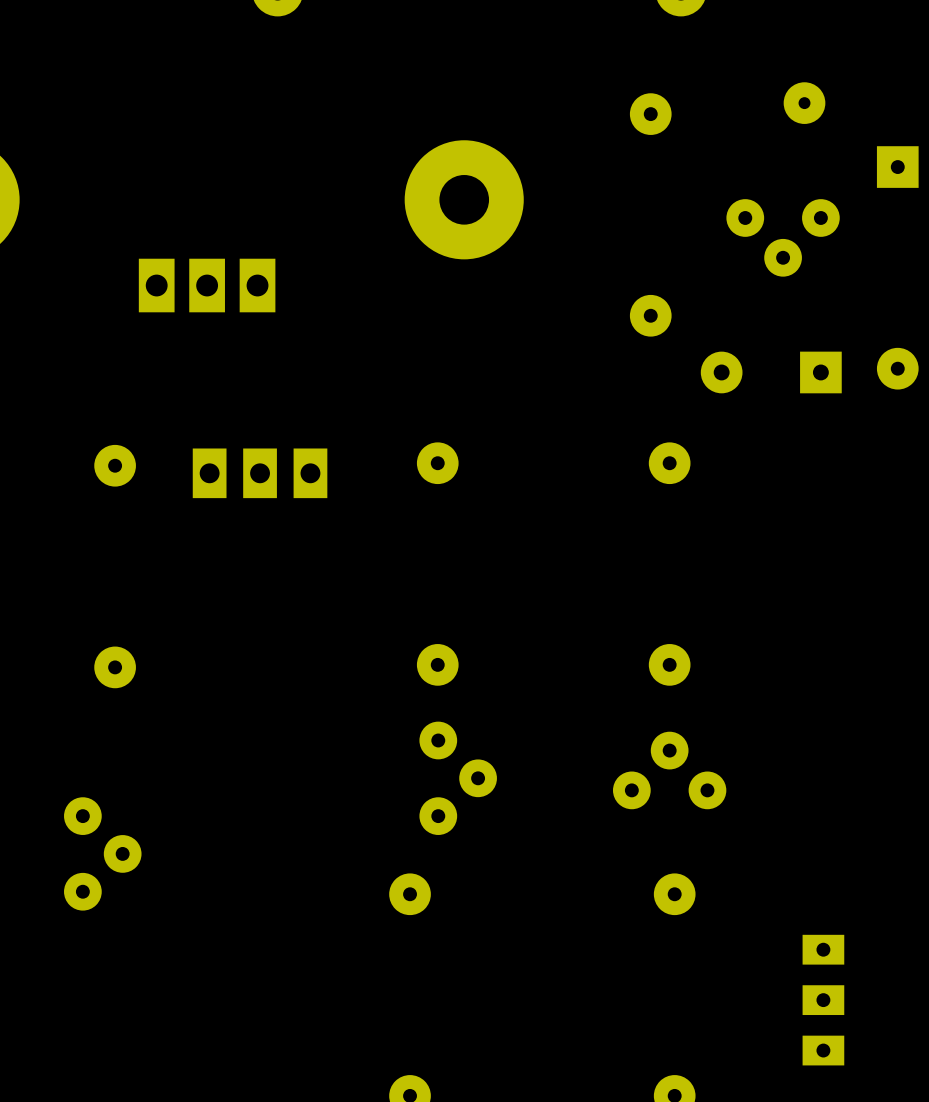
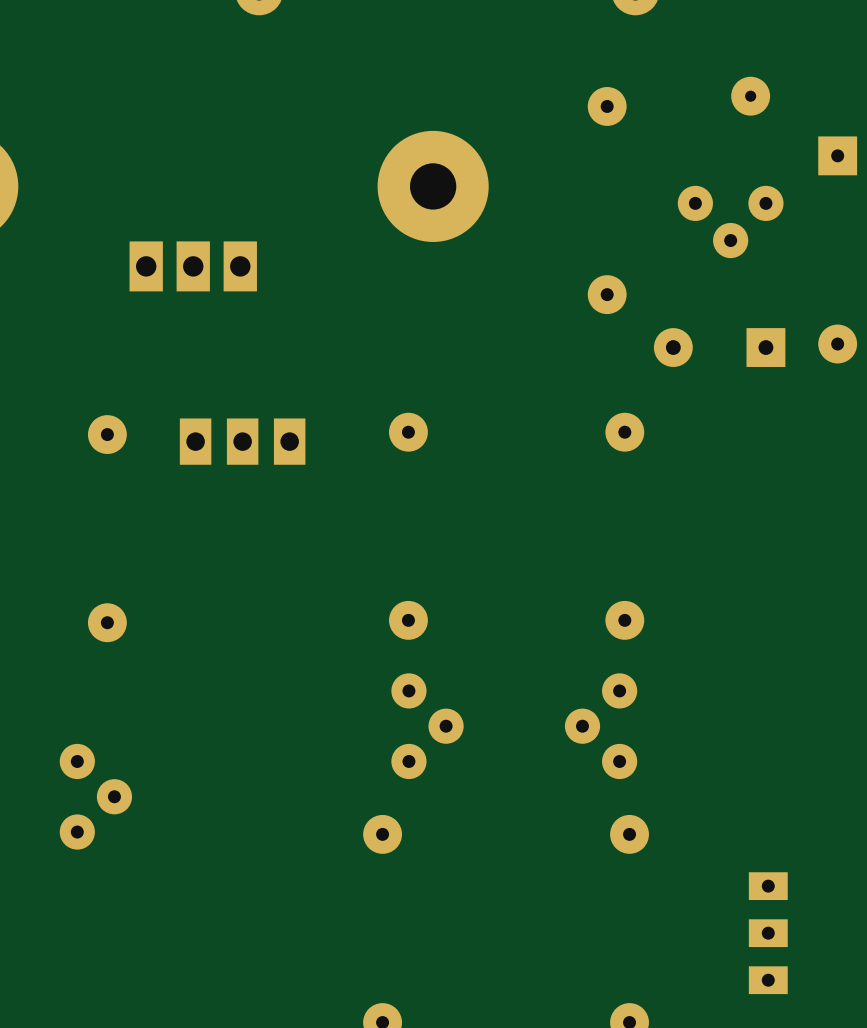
part rotation: 0° (669, 770) -> 90° counterclockwise (601, 726)

